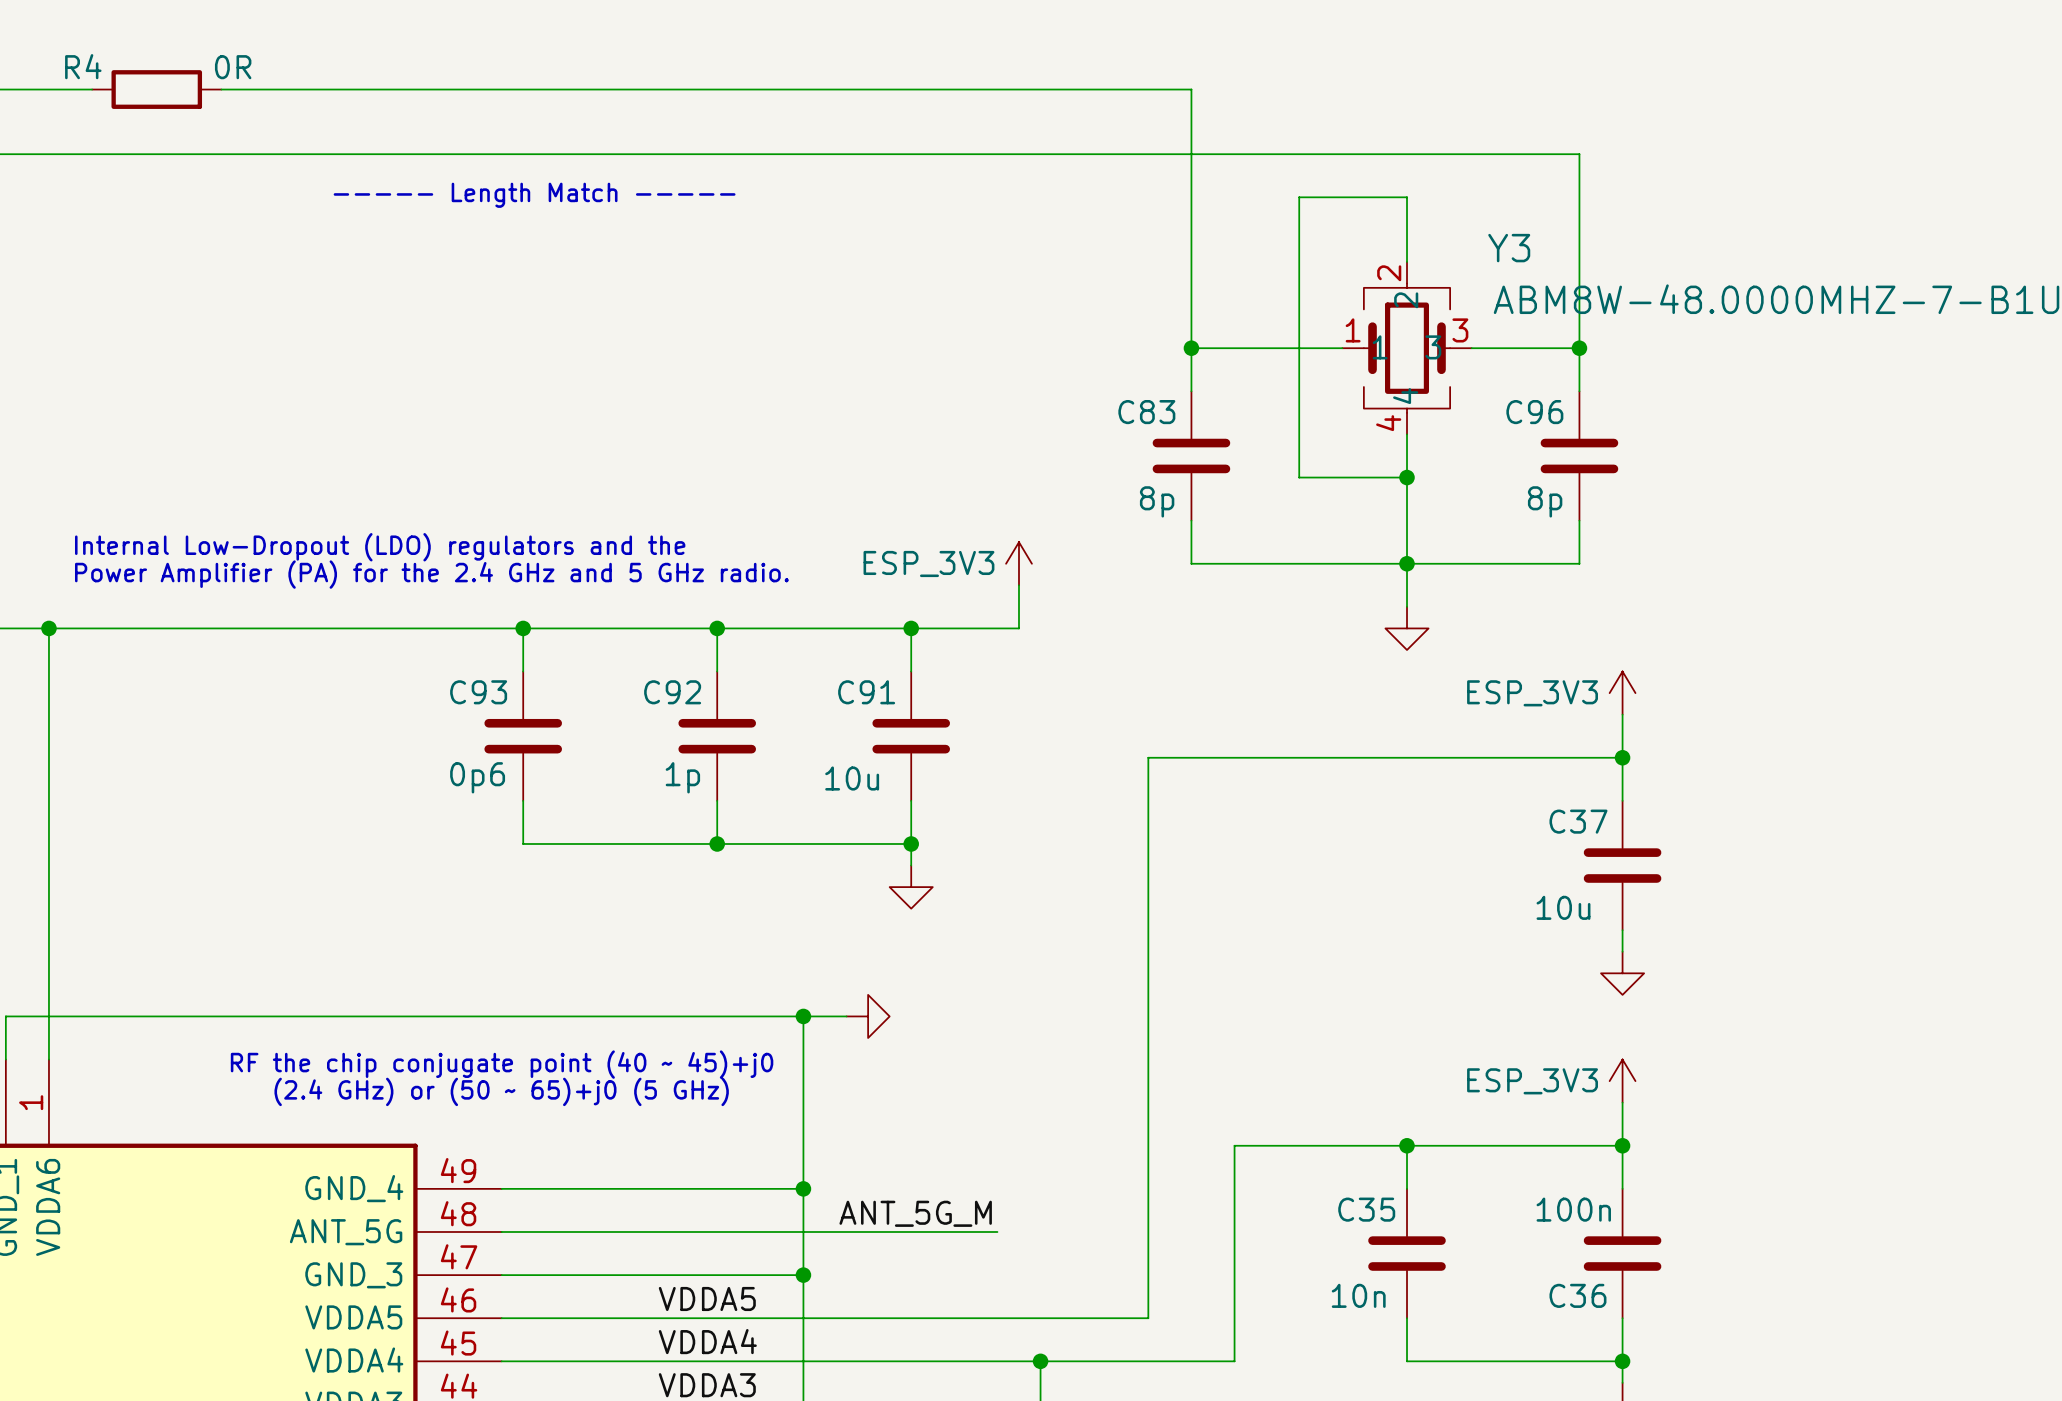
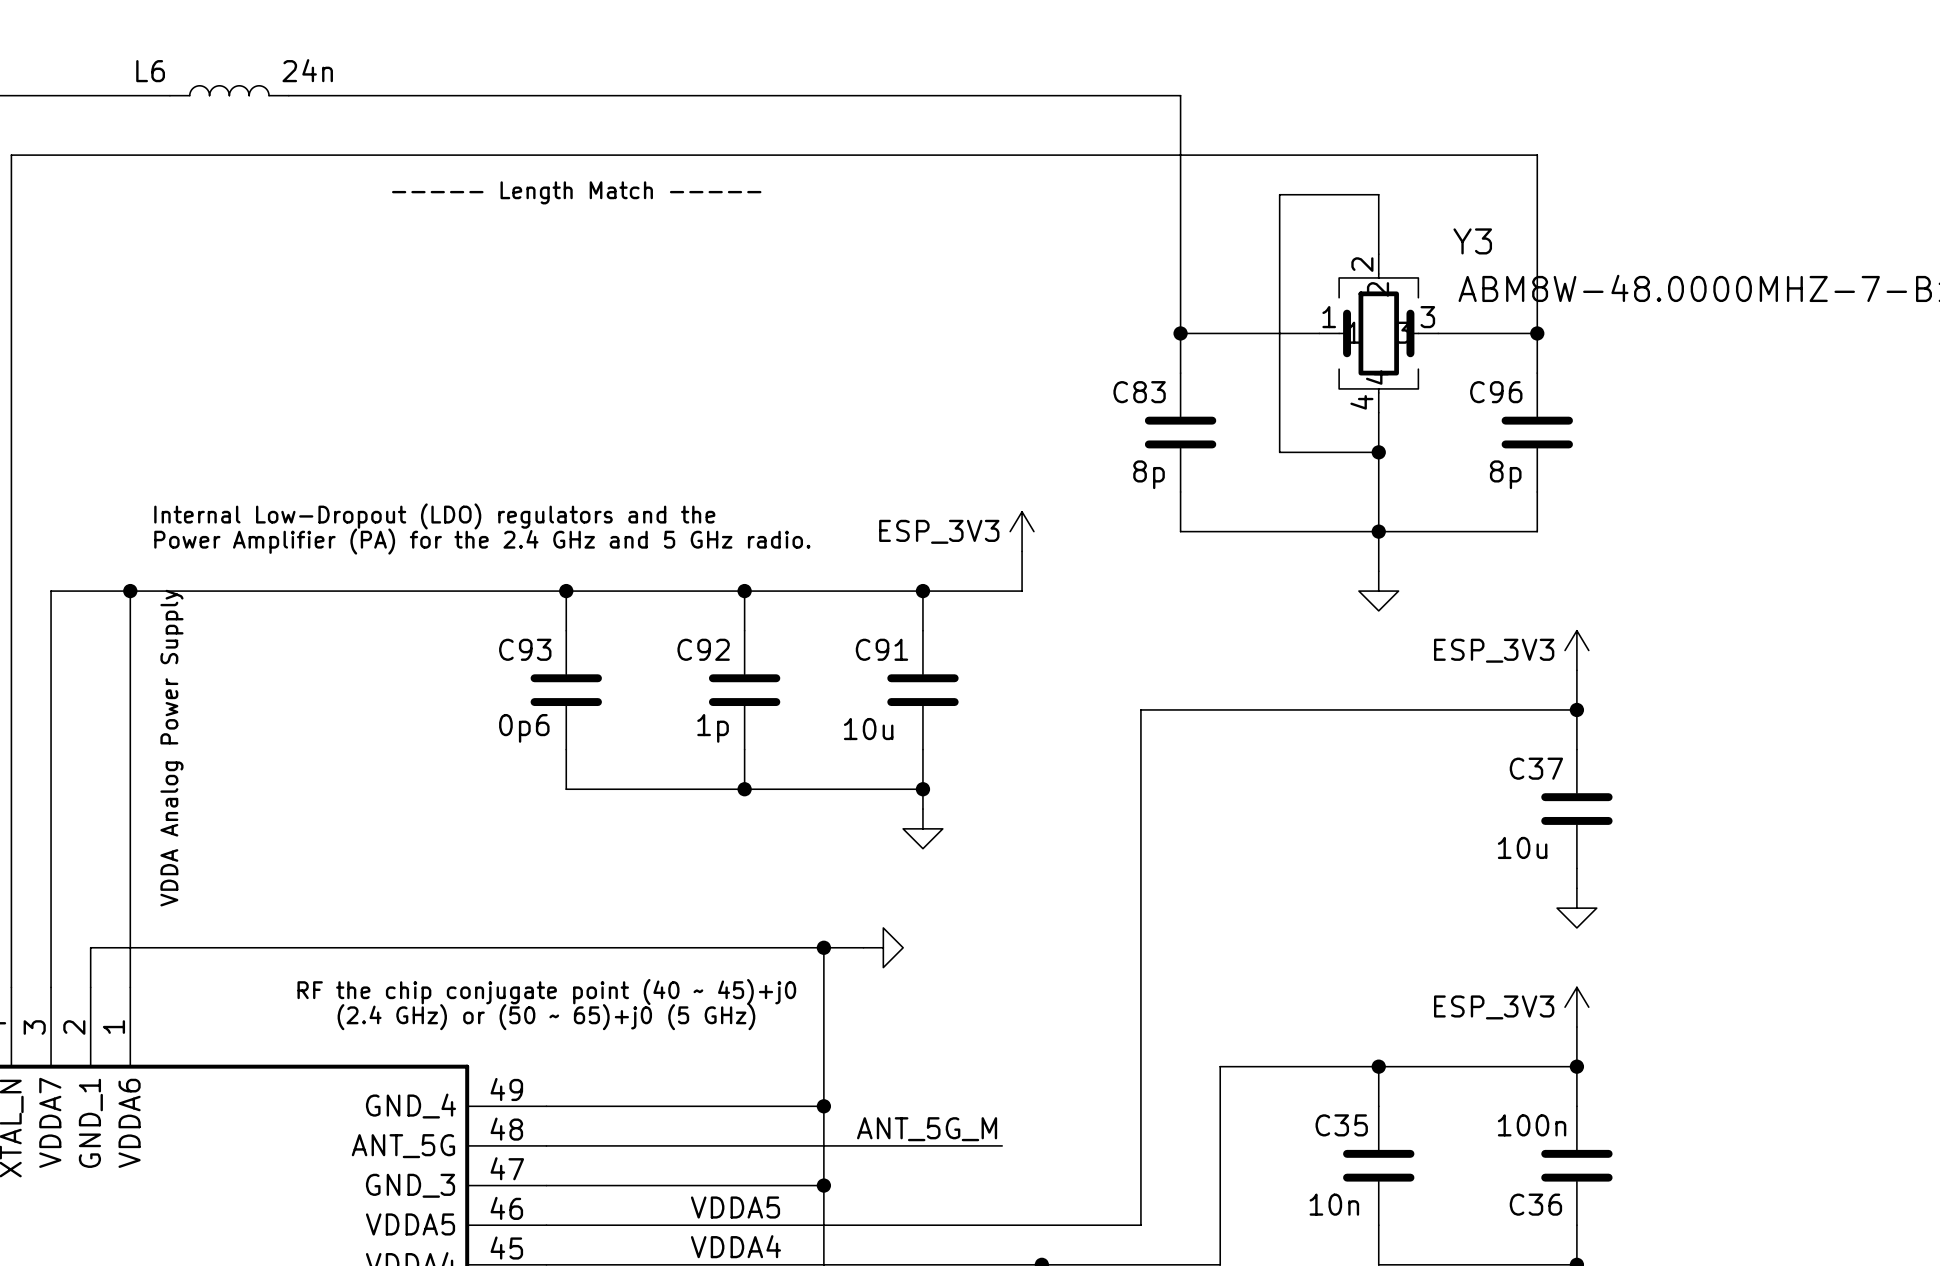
L6: none -> 24n (229, 90)
R4: 0R (156, 89) -> none
text: none -> VDDA Analog Power Supply (171, 748)

